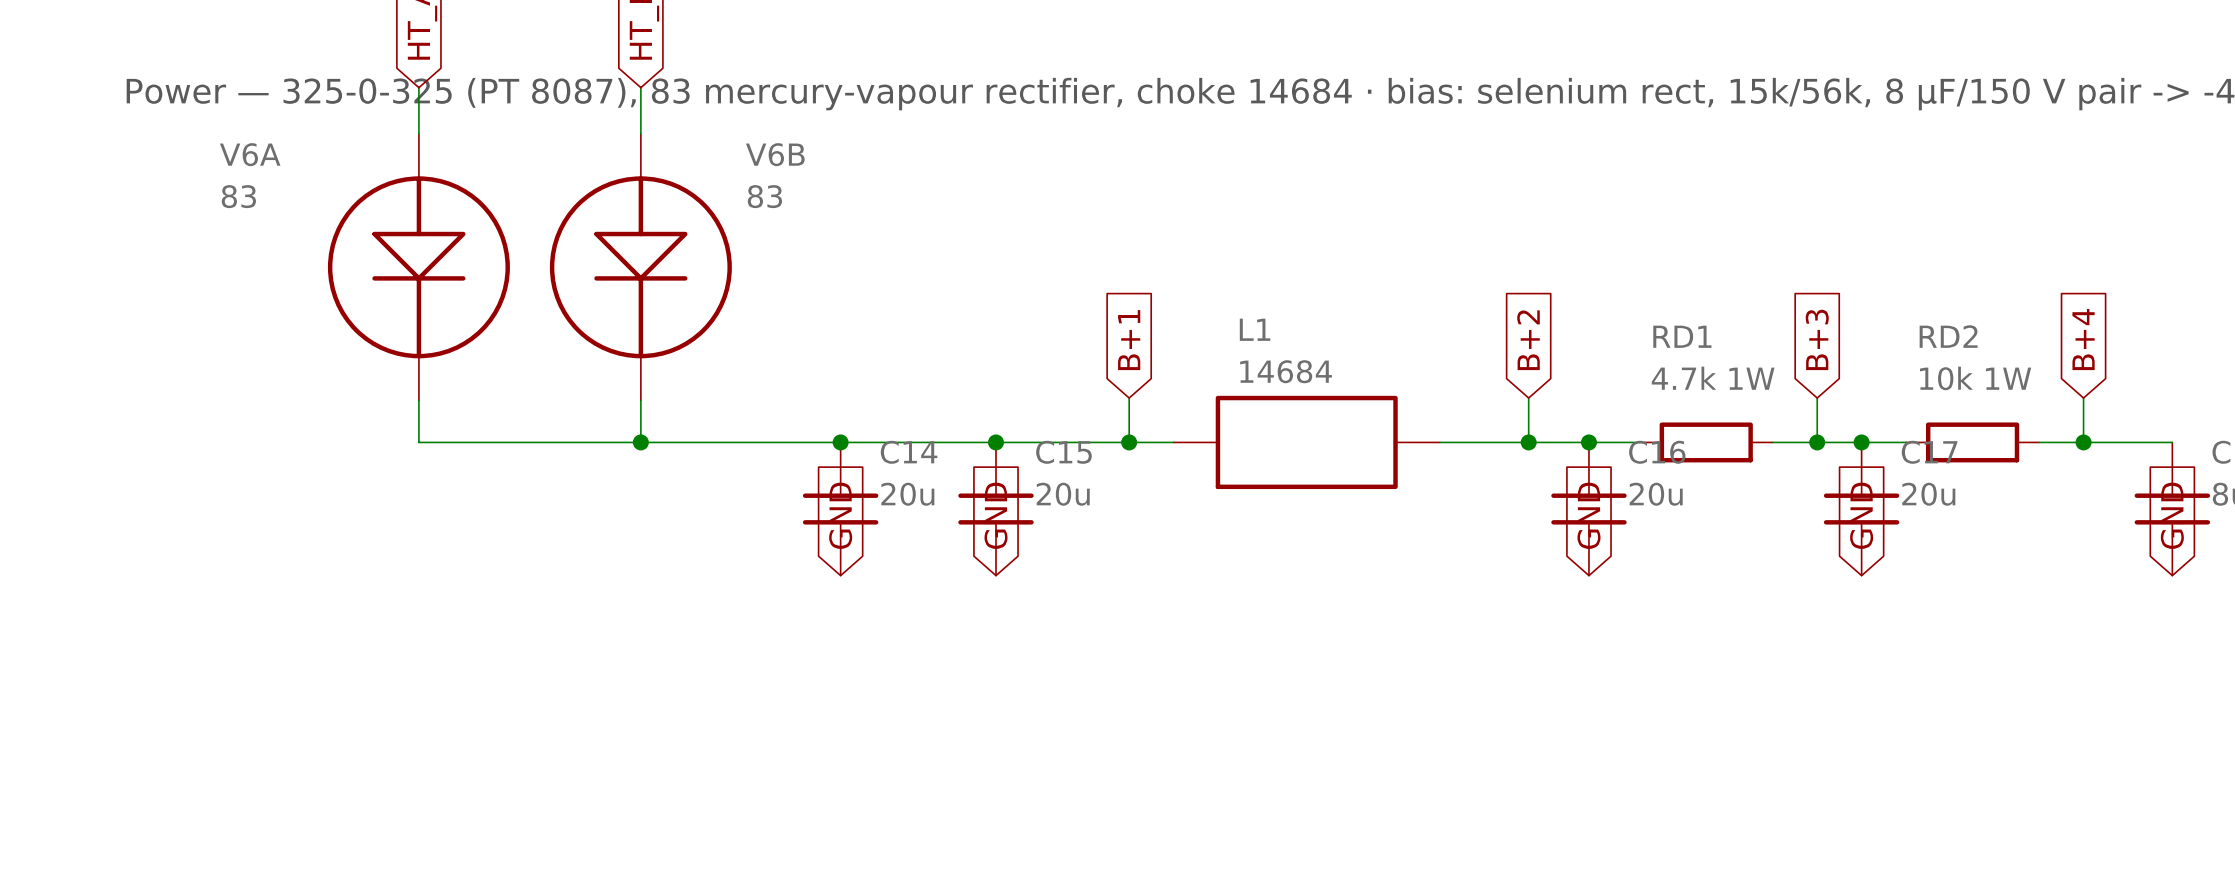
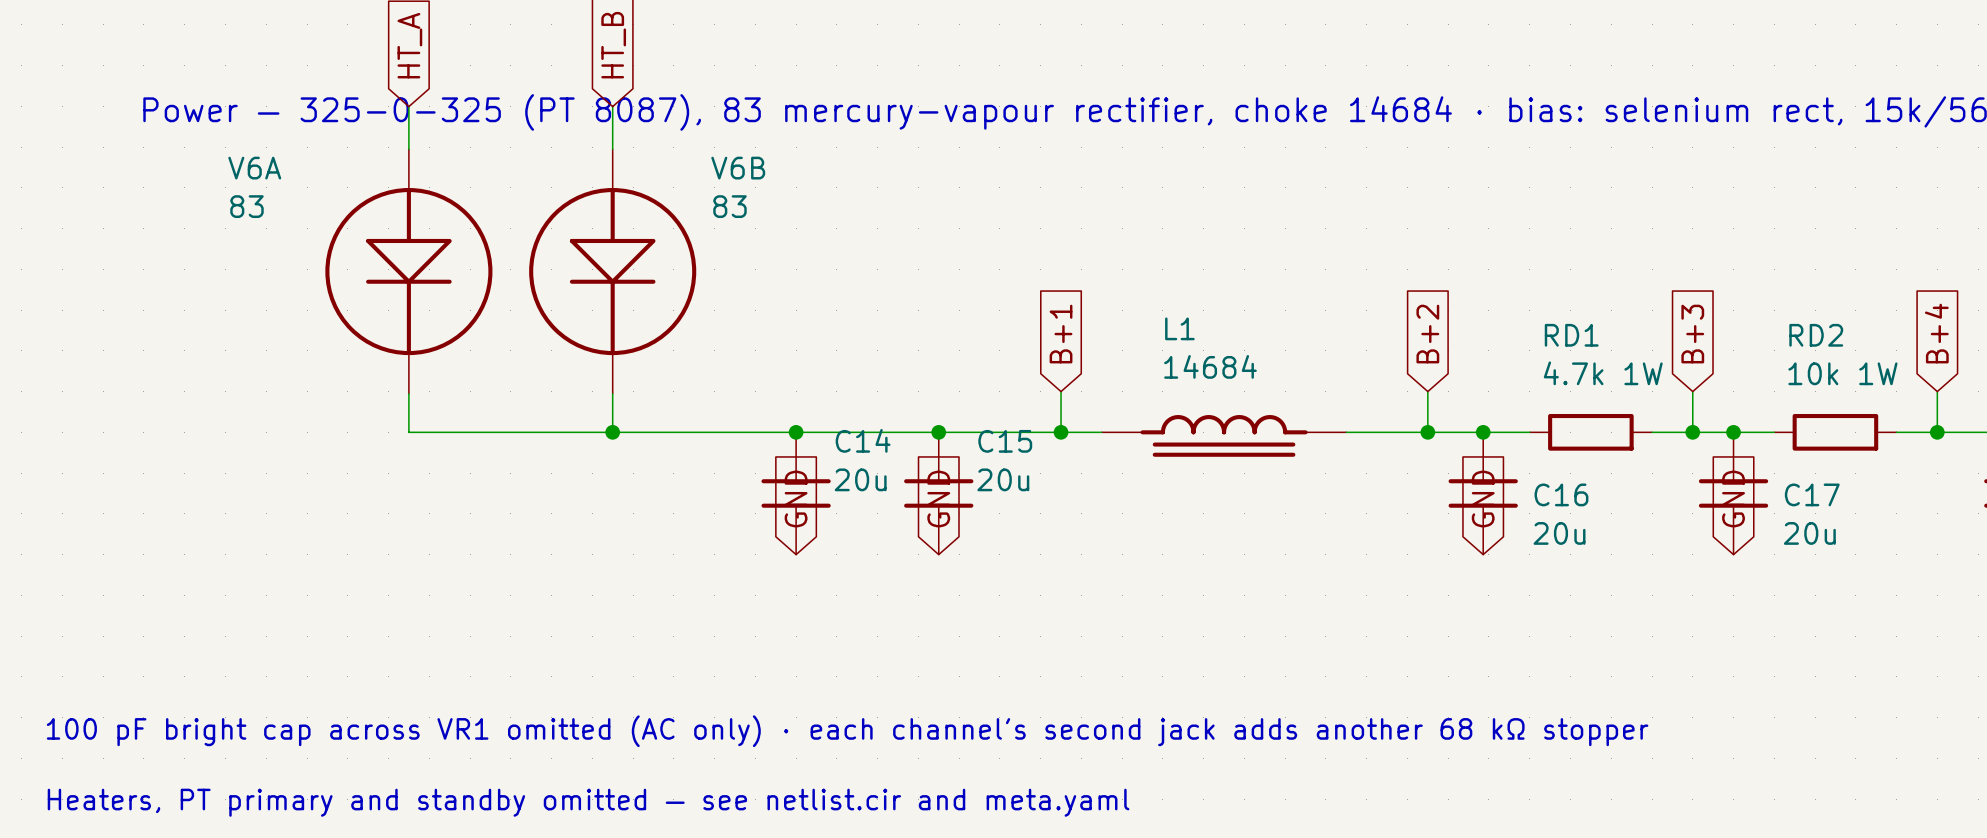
L1 symbol: [1173, 395, 1440, 490] -> [1101, 415, 1347, 457]
C16 name position: C16 (1657, 452) -> C16 (1561, 494)
C17 name position: C17 (1929, 452) -> C17 (1812, 494)
C16 value position: 20u (1656, 494) -> 20u (1559, 533)
C17 value position: 20u (1928, 494) -> 20u (1809, 533)
text: none -> 100 pF bright cap across VR1 omitted (AC only) · each channel's second jack adds another 68 kΩ stopper (847, 731)
text: none -> Heaters, PT primary and standby omitted — see netlist.cir and meta.yaml (588, 802)

